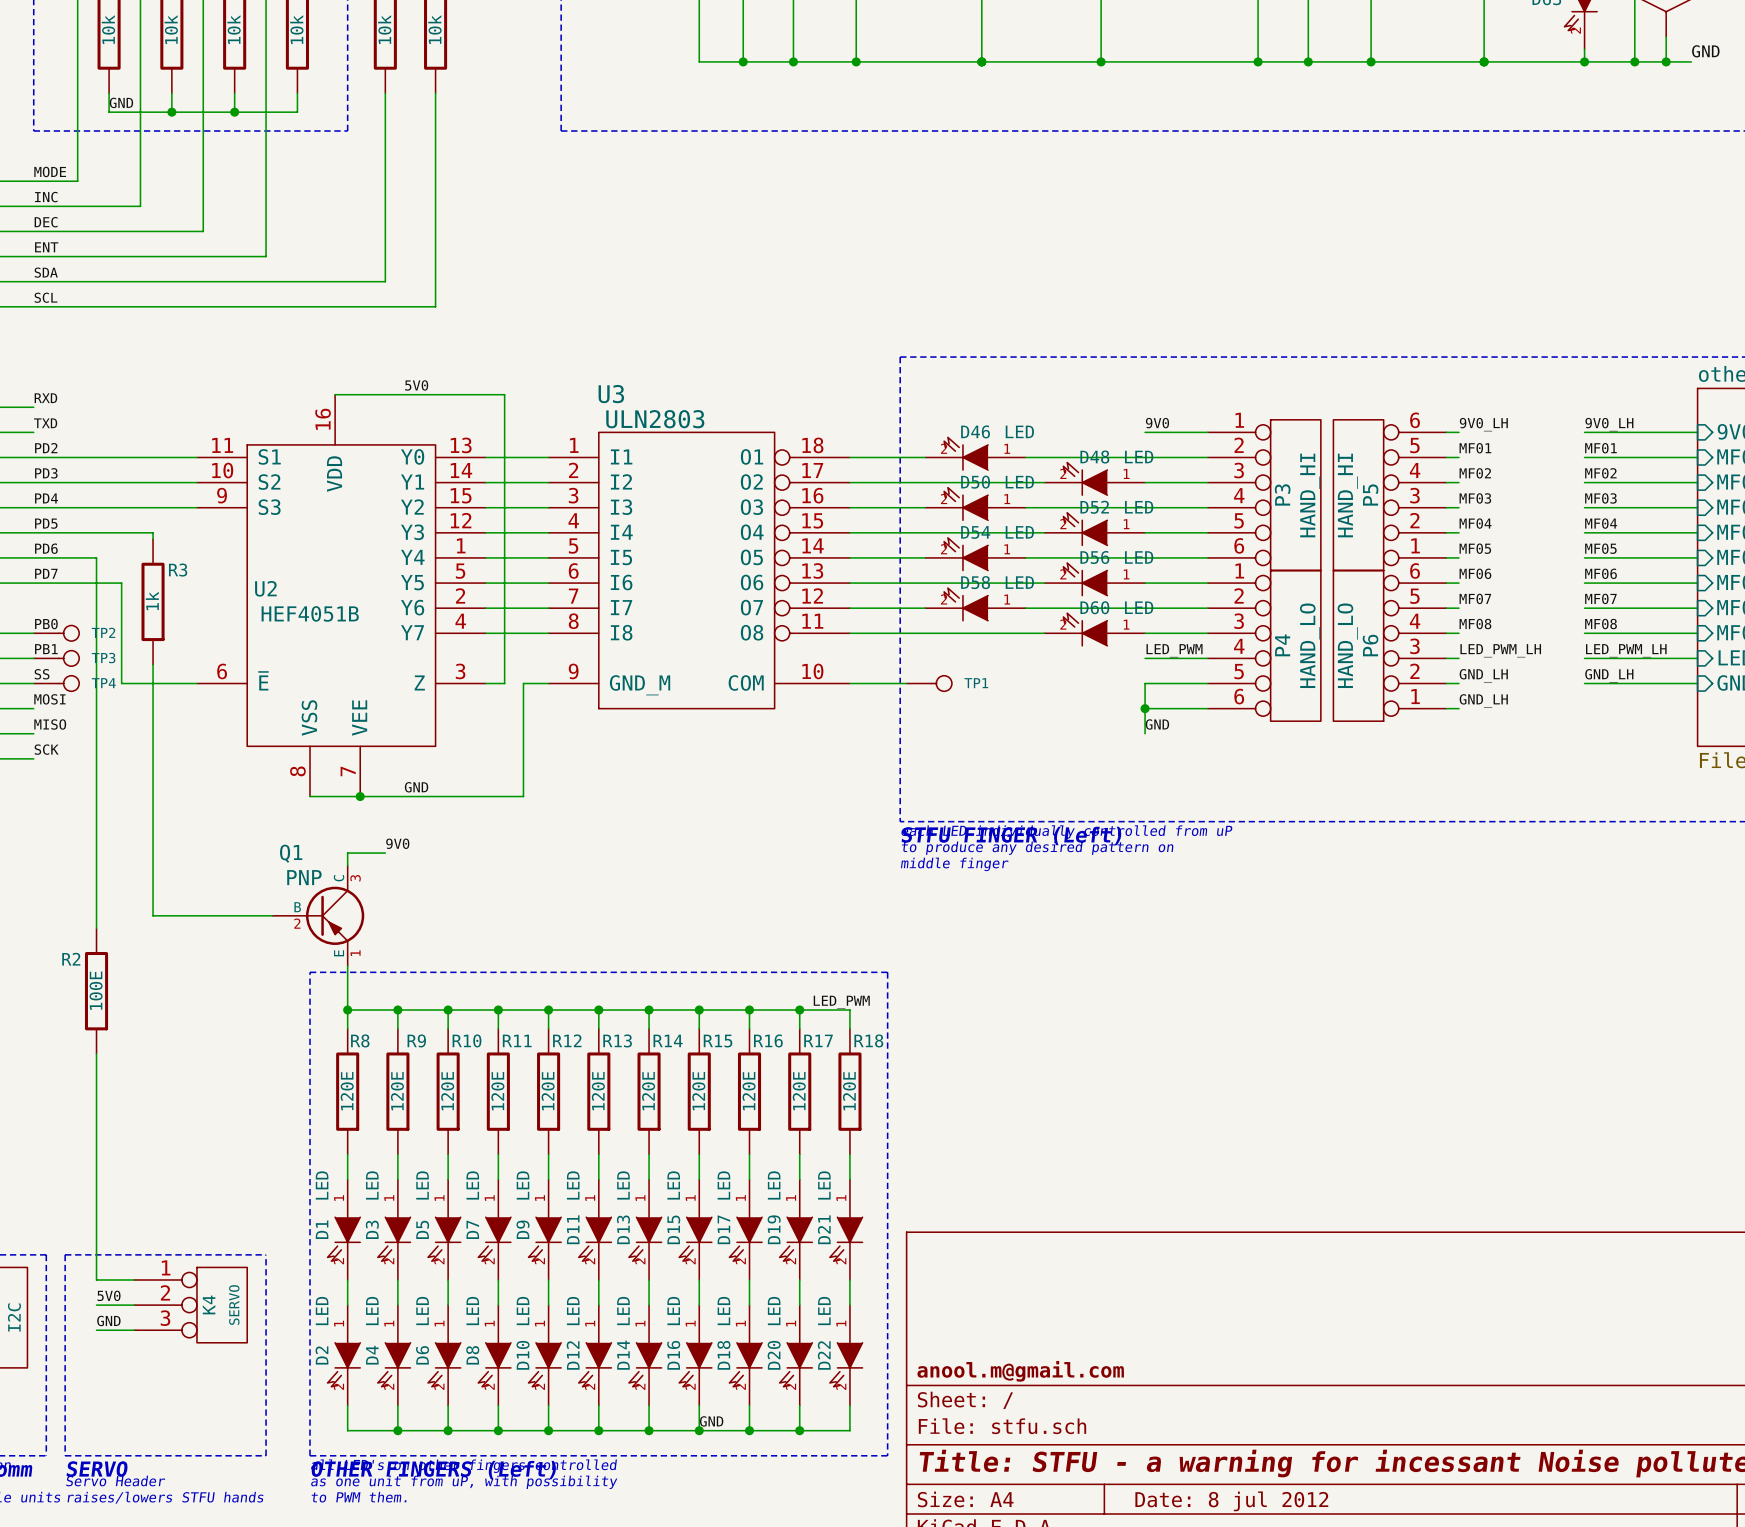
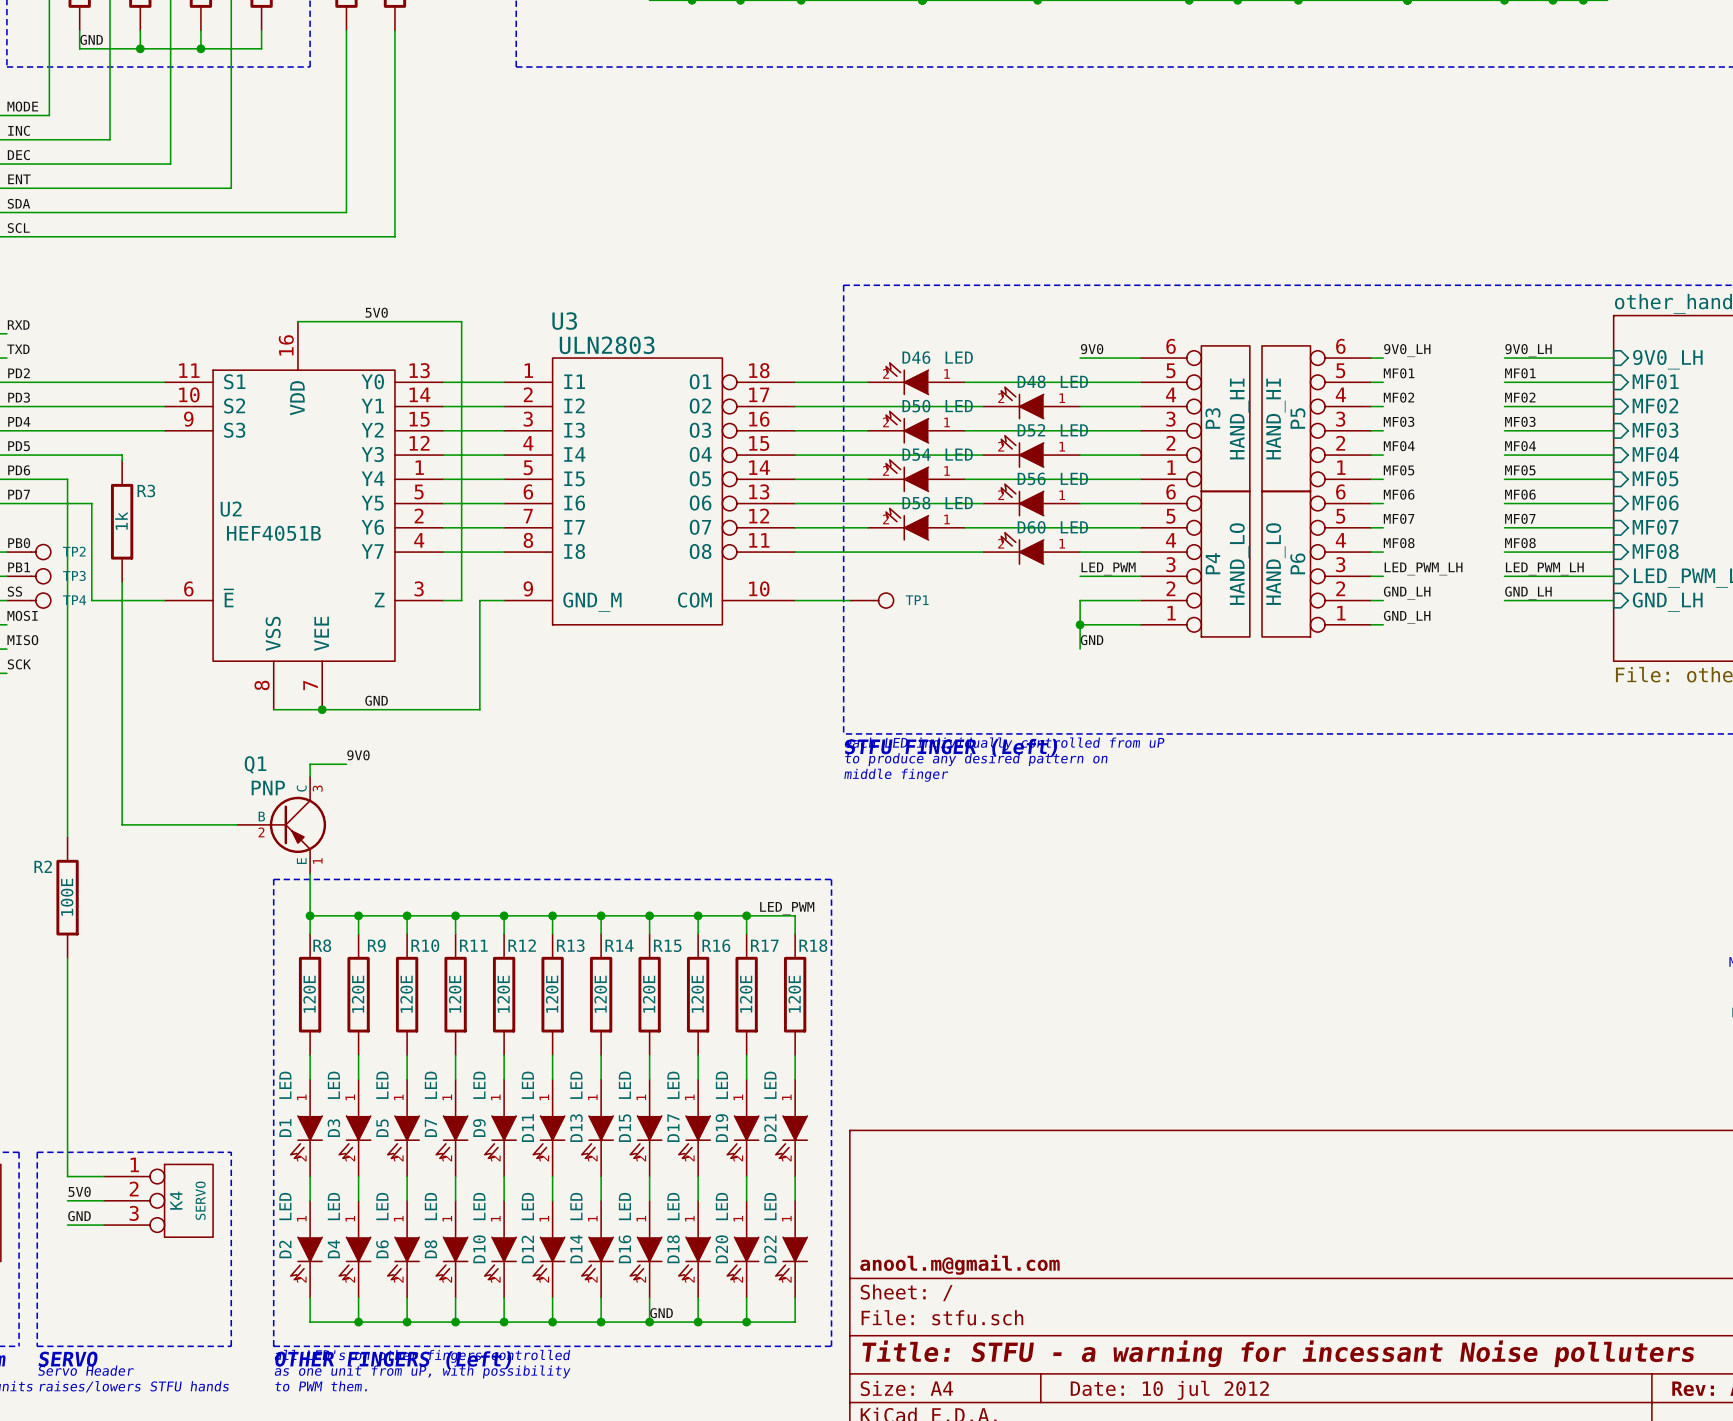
P3 flip: as is (1295, 495) -> up-down (1225, 418)
P4 flip: as is (1295, 645) -> up-down (1225, 564)
title block: Date: 8 jul 2012 (1231, 1501) -> Date: 10 jul 2012 (1169, 1390)

